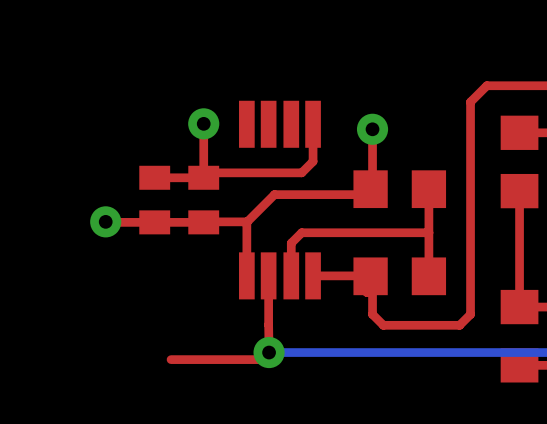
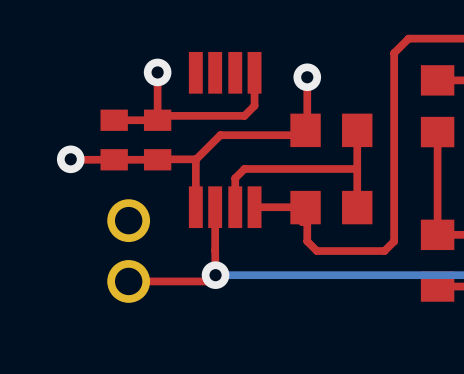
part: none -> (128, 251)

